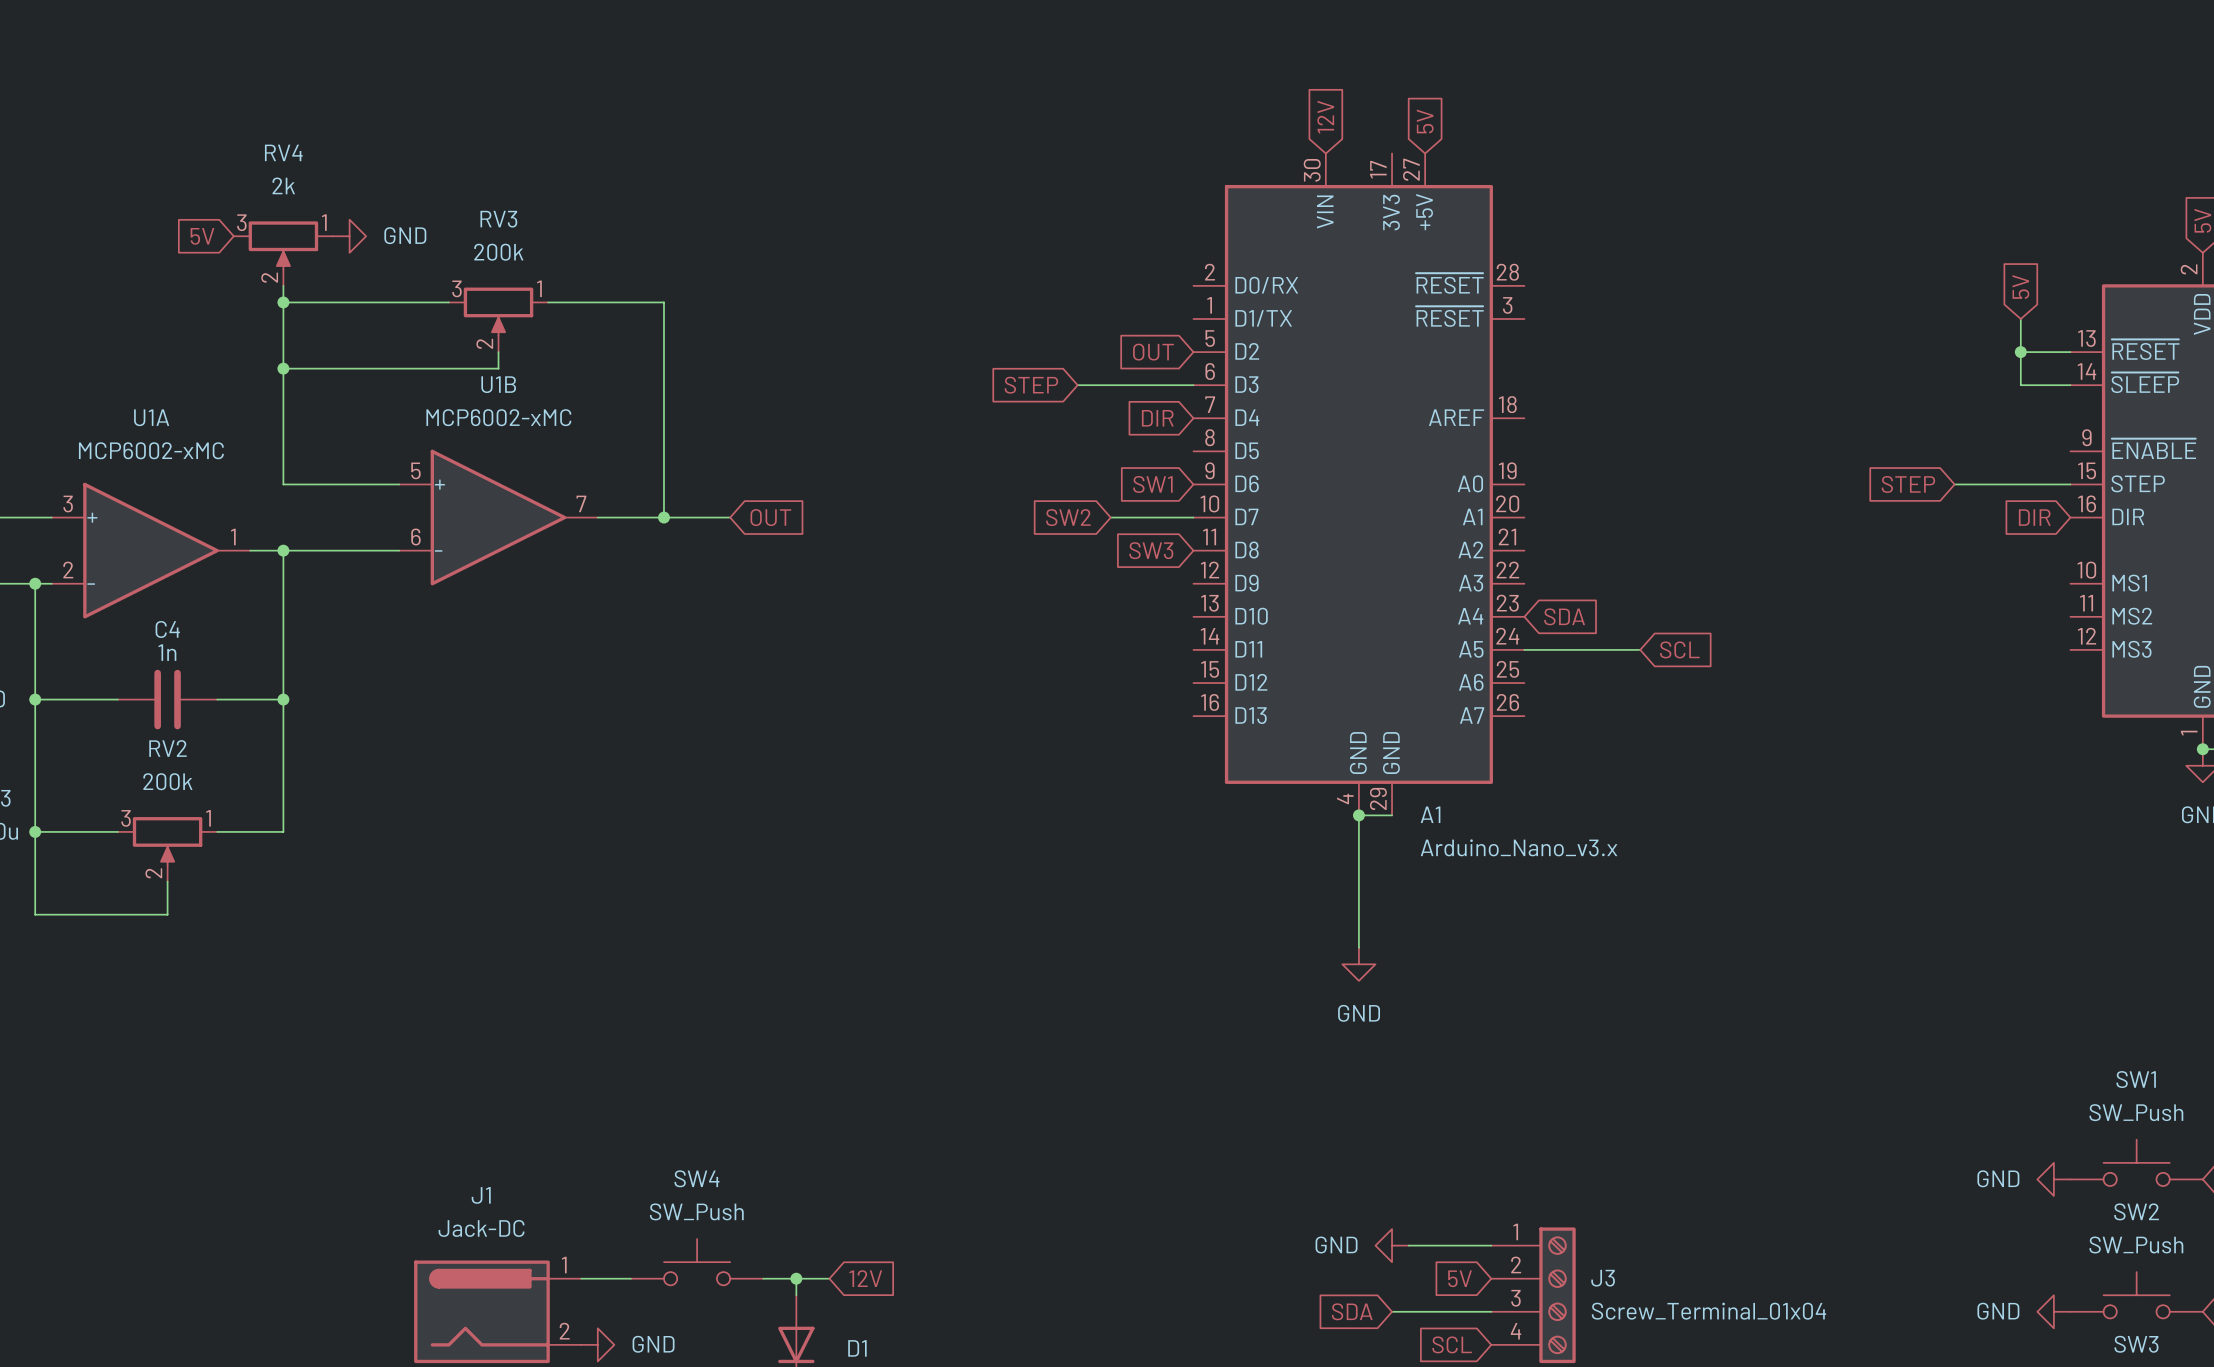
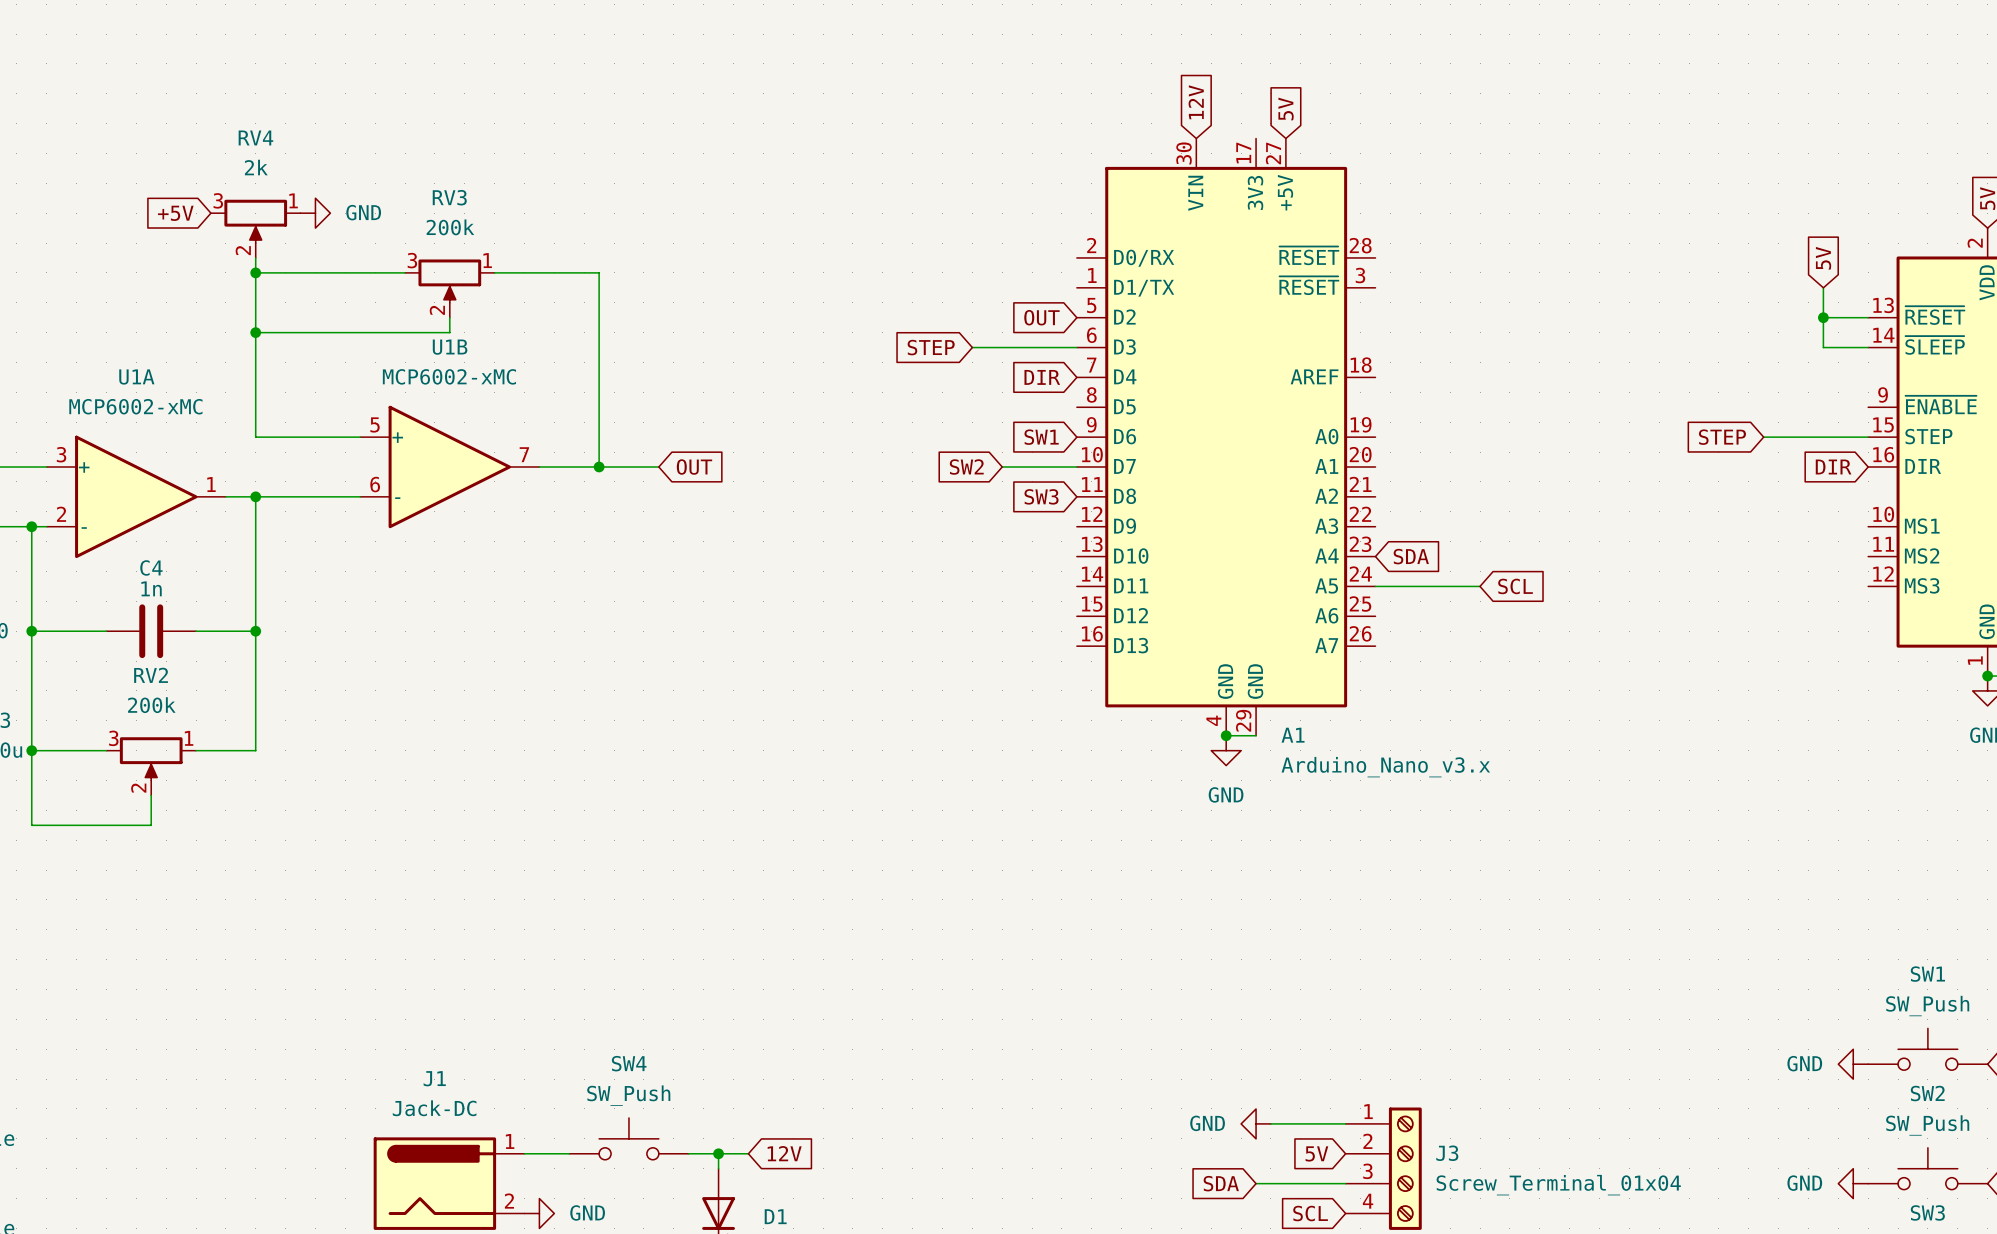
global label: 5V (202, 236) -> +5V (175, 213)
wire: (1358, 815) (1358, 947) -> none
power symbol position: GND (1358, 964) -> GND (1226, 750)

